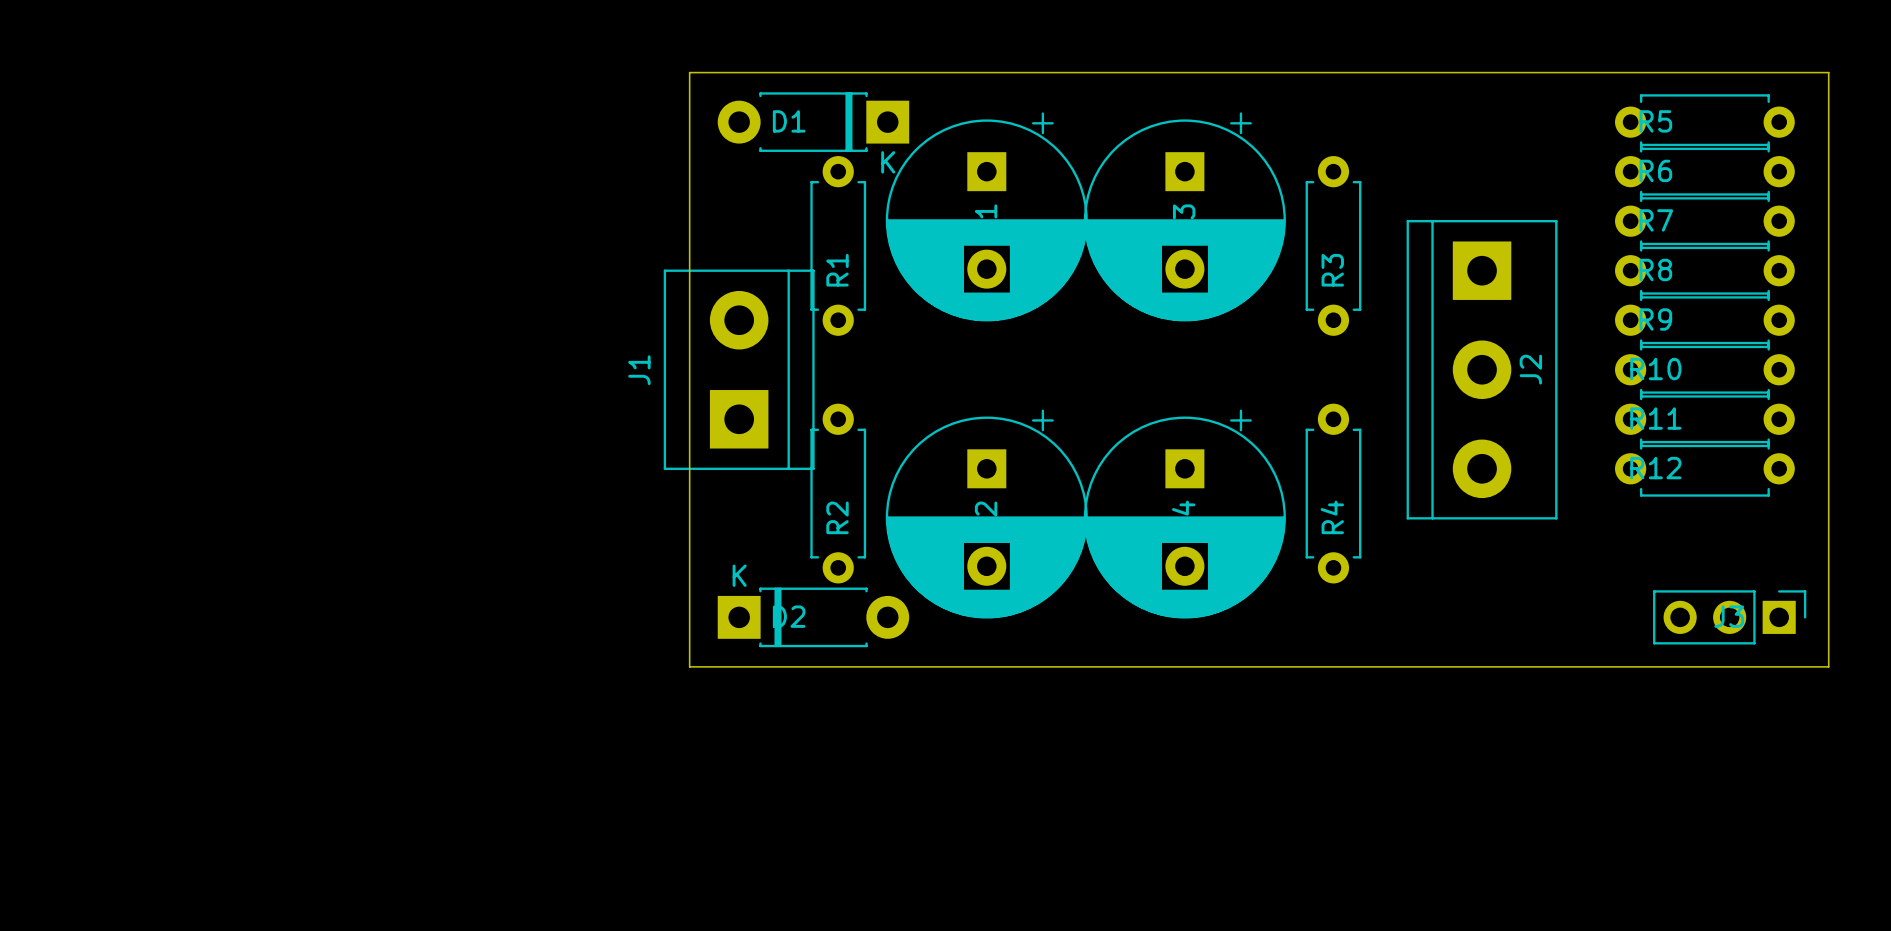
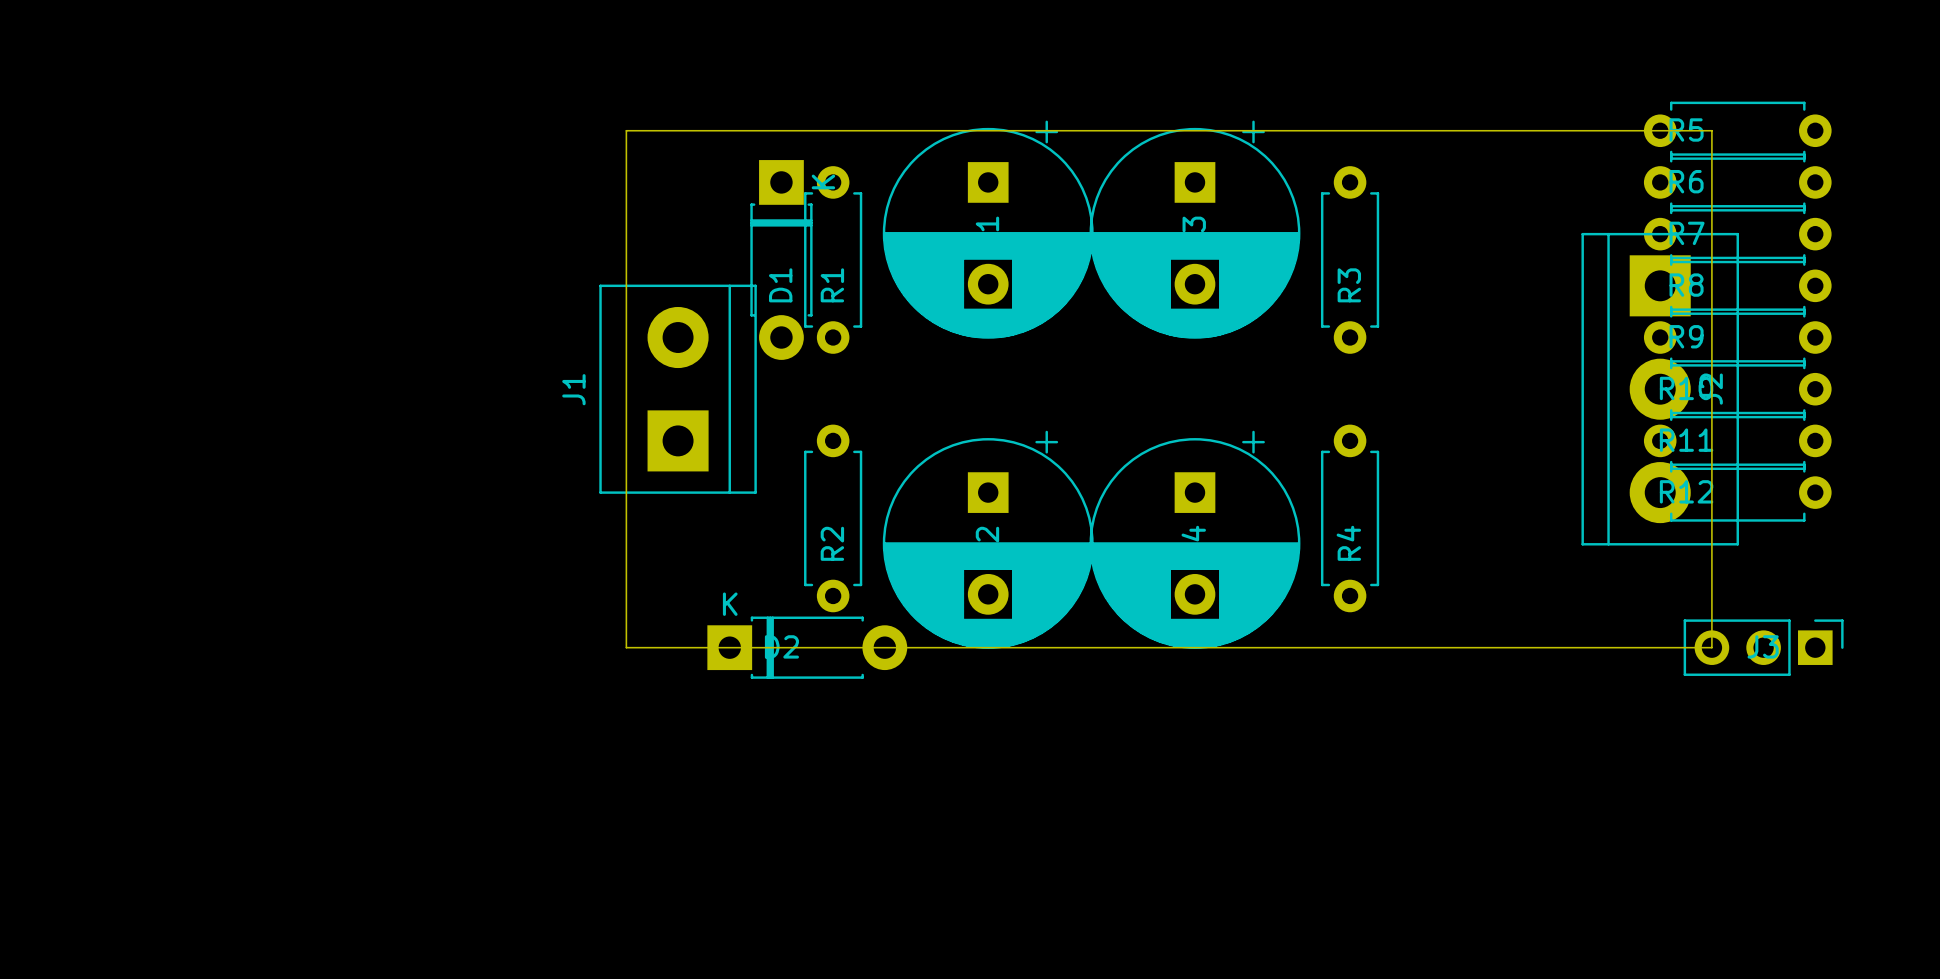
board edge: (689, 72) (689, 666) (1828, 666) (1828, 72) (689, 72) -> (626, 130) (626, 647) (1711, 647) (1711, 130) (626, 130)
D1 rotation: 0° (813, 122) -> 90° counterclockwise (781, 259)
D1 position: (813, 122) -> (781, 259)
J1 position: (739, 369) -> (678, 389)
J2 position: (1482, 369) -> (1660, 389)

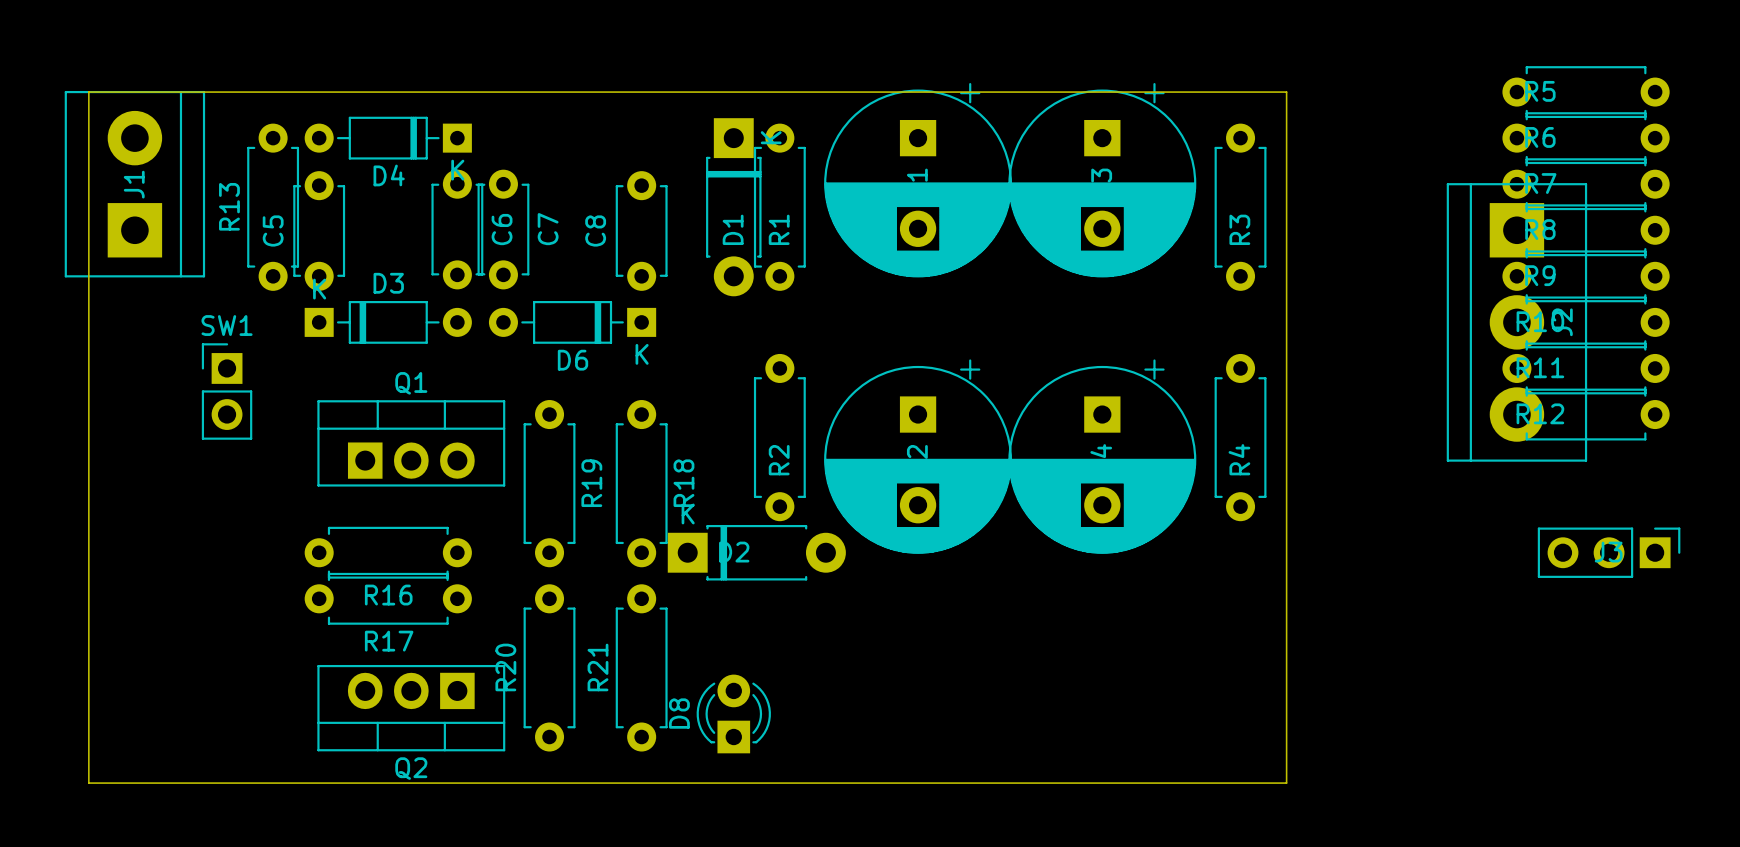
board edge: (626, 130) (626, 647) (1711, 647) (1711, 130) (1401, 130) -> (595, 92) (88, 92) (88, 783) (1286, 783) (1286, 92)
D4: none -> (388, 138)
R13: none -> (273, 207)
C6: none -> (457, 229)
C7: none -> (503, 229)
C5: none -> (319, 230)
C8: none -> (641, 230)
D3: none -> (388, 322)
J1 name position: J1 (573, 389) -> J1 (134, 184)
D6: none -> (572, 322)
J1 position: (678, 389) -> (134, 184)
SW1: none -> (227, 391)
Q1: none -> (411, 443)
R19: none -> (549, 483)
R18: none -> (641, 483)
R16: none -> (388, 552)
R17: none -> (388, 598)
R20: none -> (549, 667)
R21: none -> (641, 667)
Q2: none -> (411, 708)
D8: none -> (733, 713)

